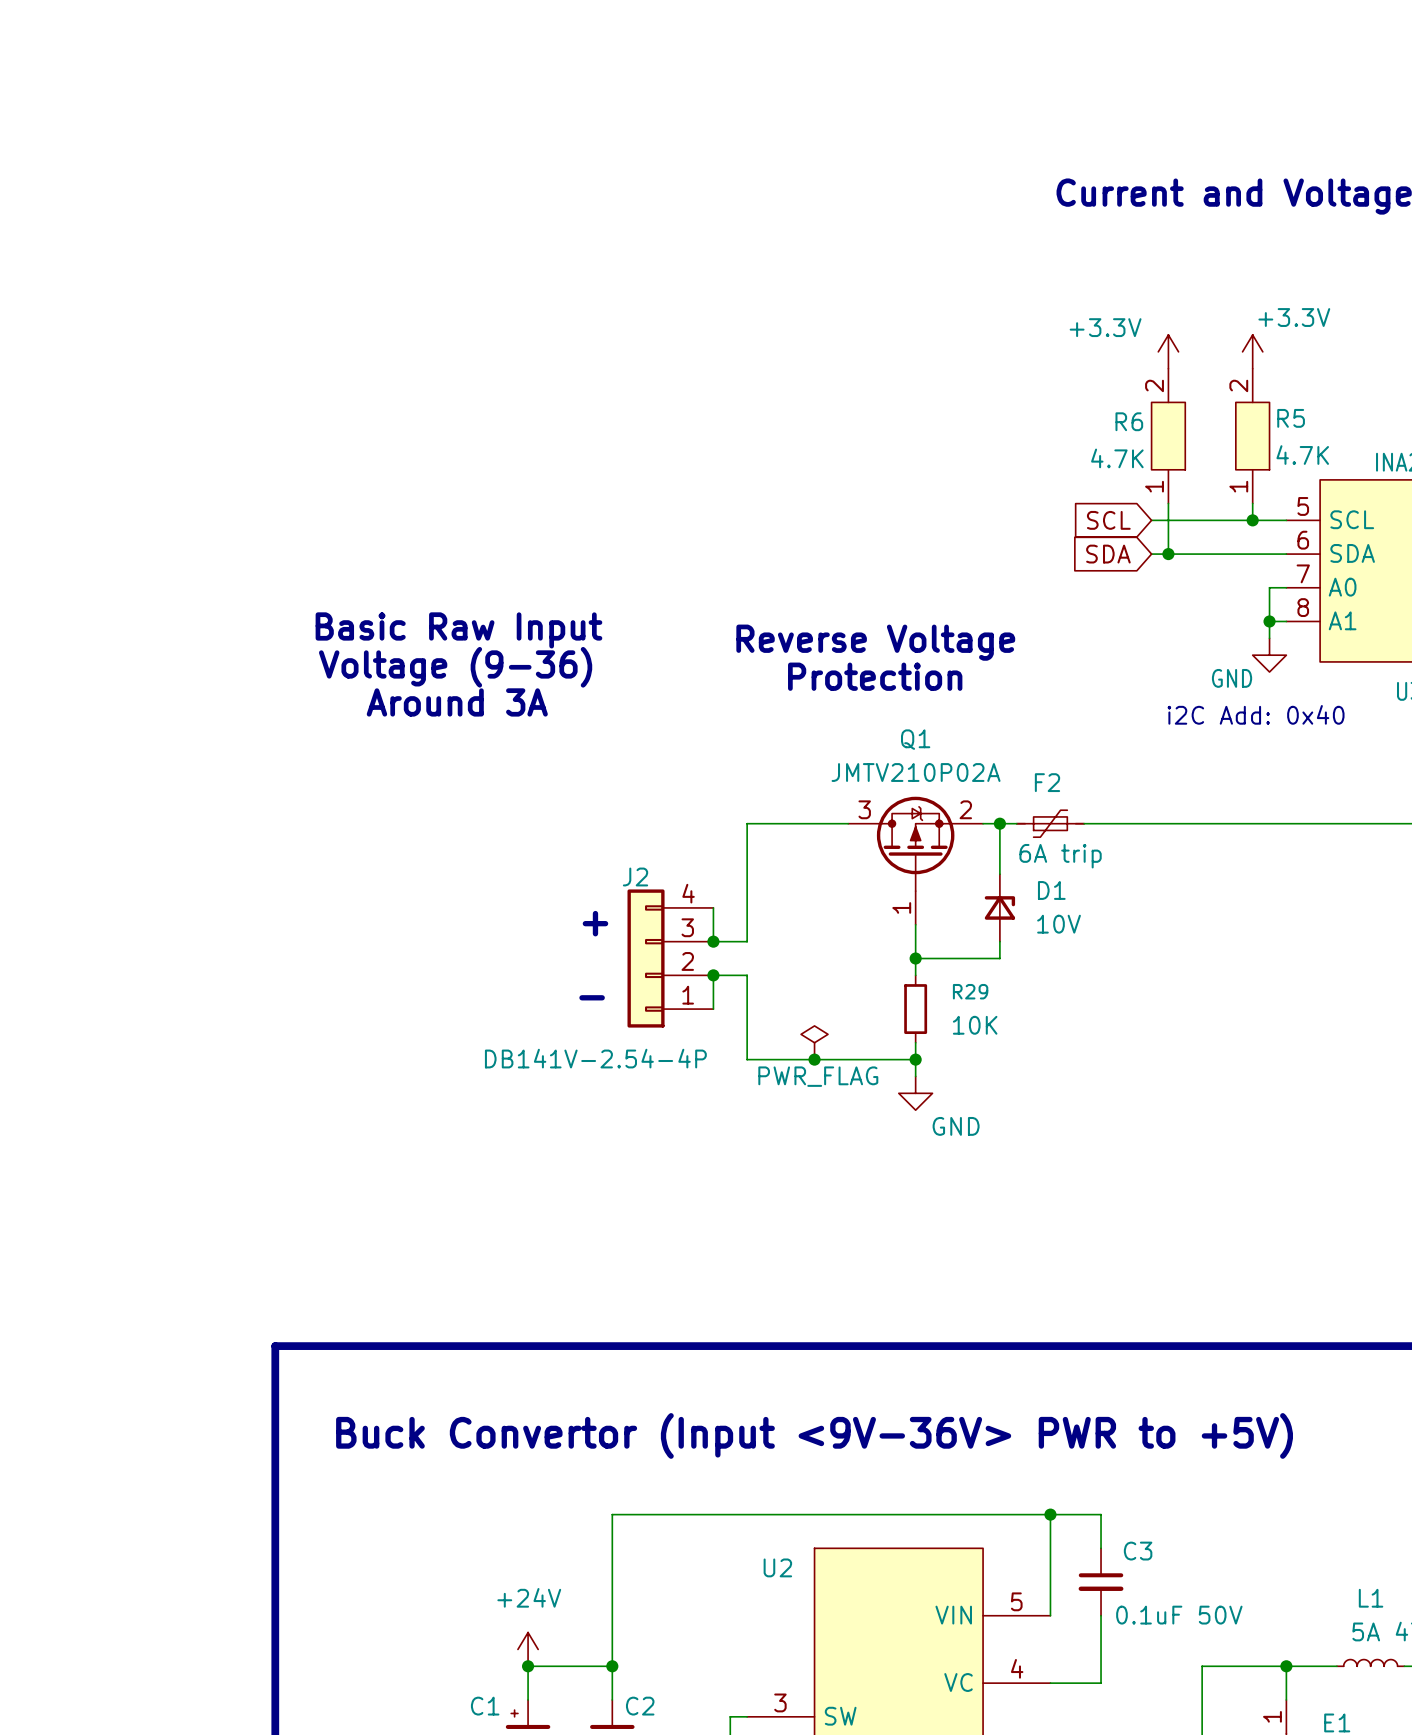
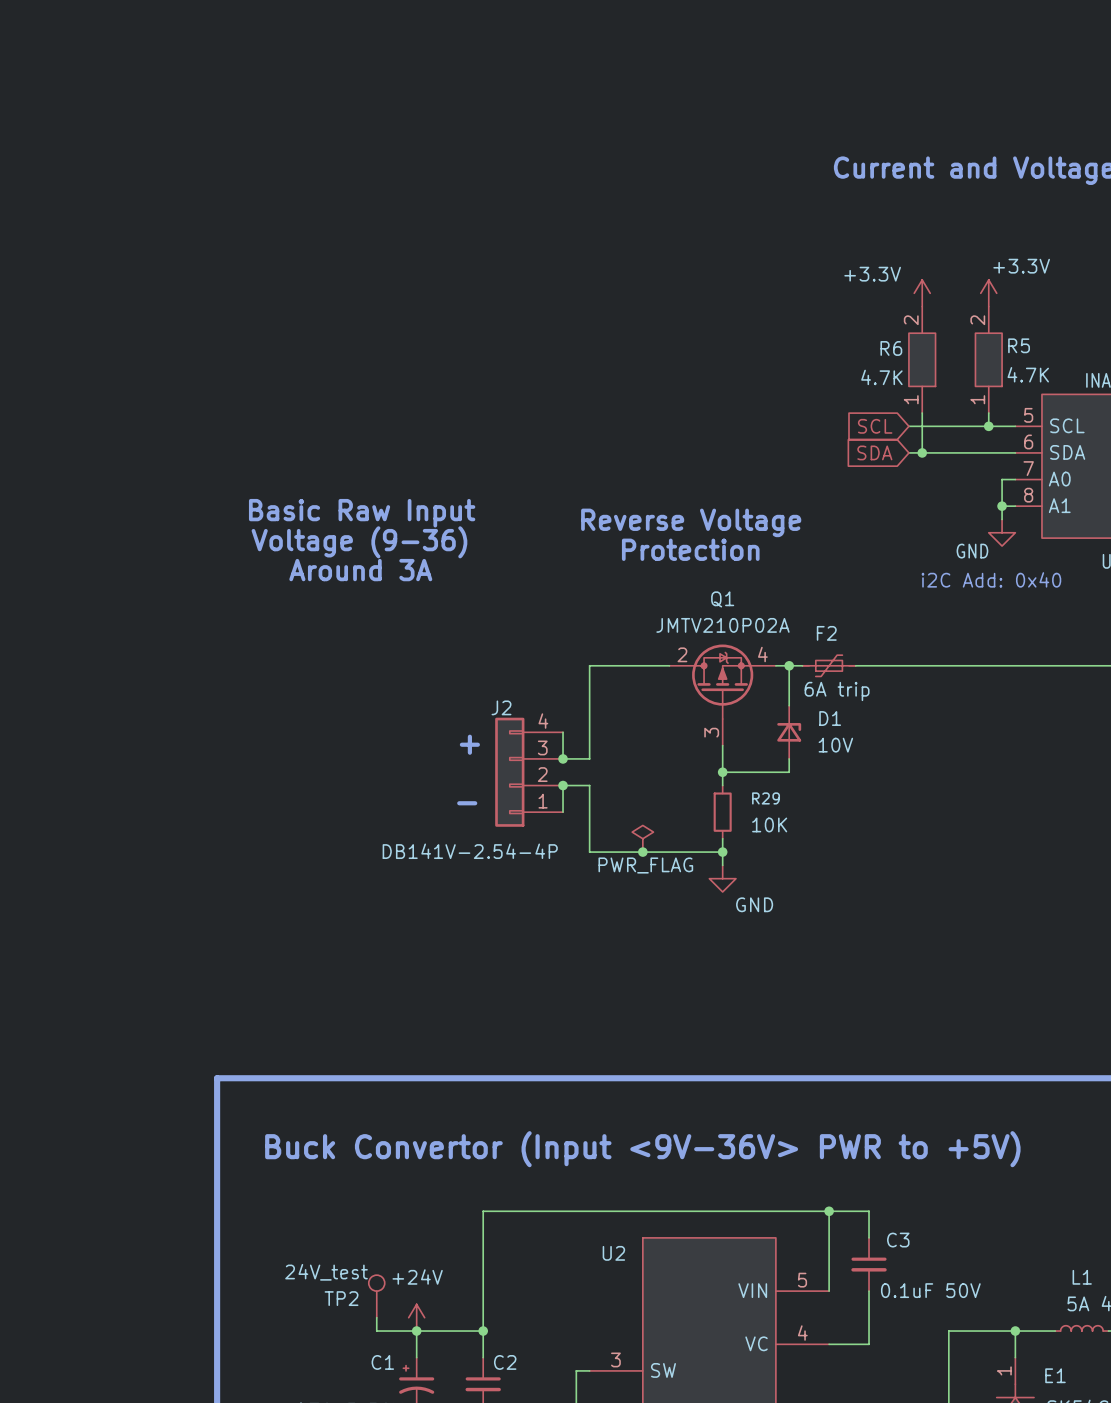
Q1 pin number: 3 (864, 809) -> 2 (682, 654)
Q1 pin number: 2 (965, 809) -> 4 (762, 654)
Q1 pin number: 1 (901, 907) -> 3 (711, 732)
TP2: none -> 24V_test (376, 1296)
wire: none -> (376, 1317) (376, 1331) (416, 1331)

